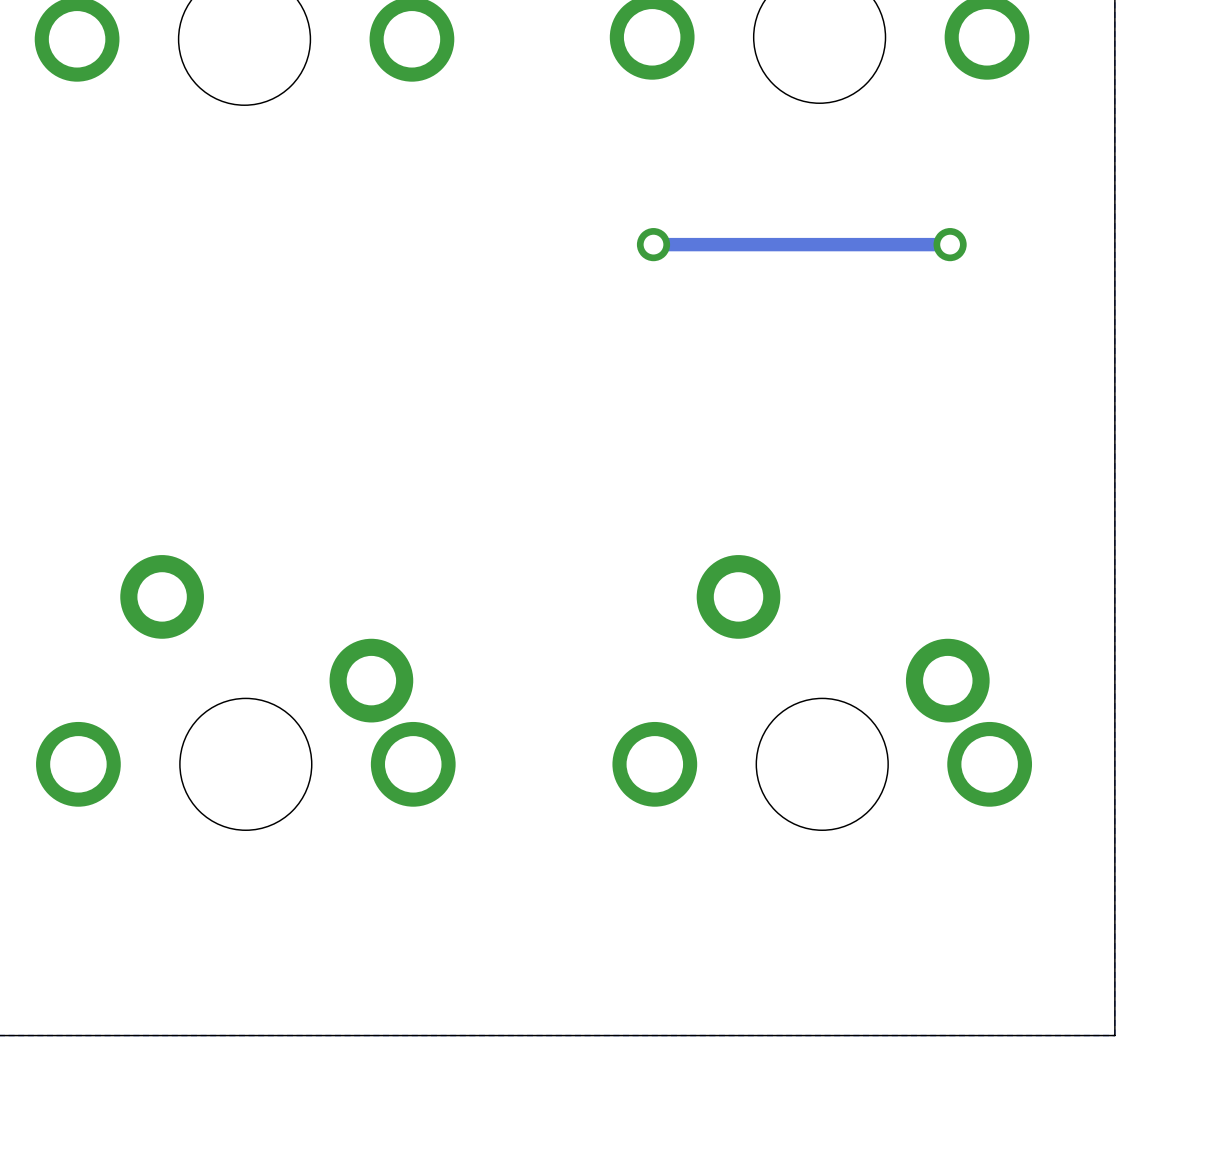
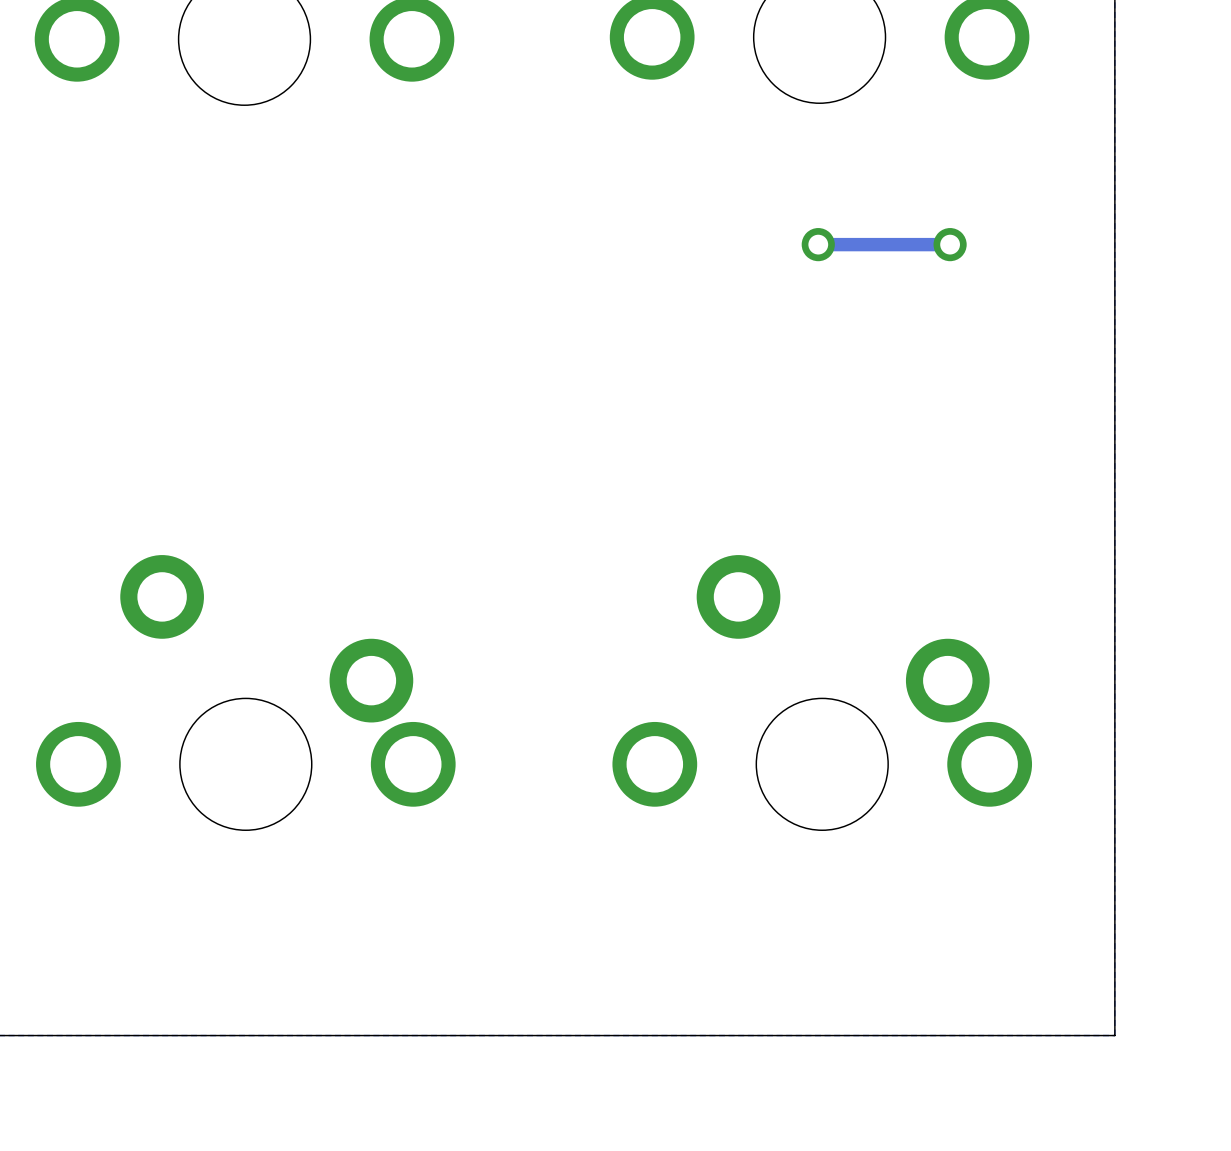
via position: (653, 244) -> (818, 244)
track: (818, 244) (653, 244) -> none

